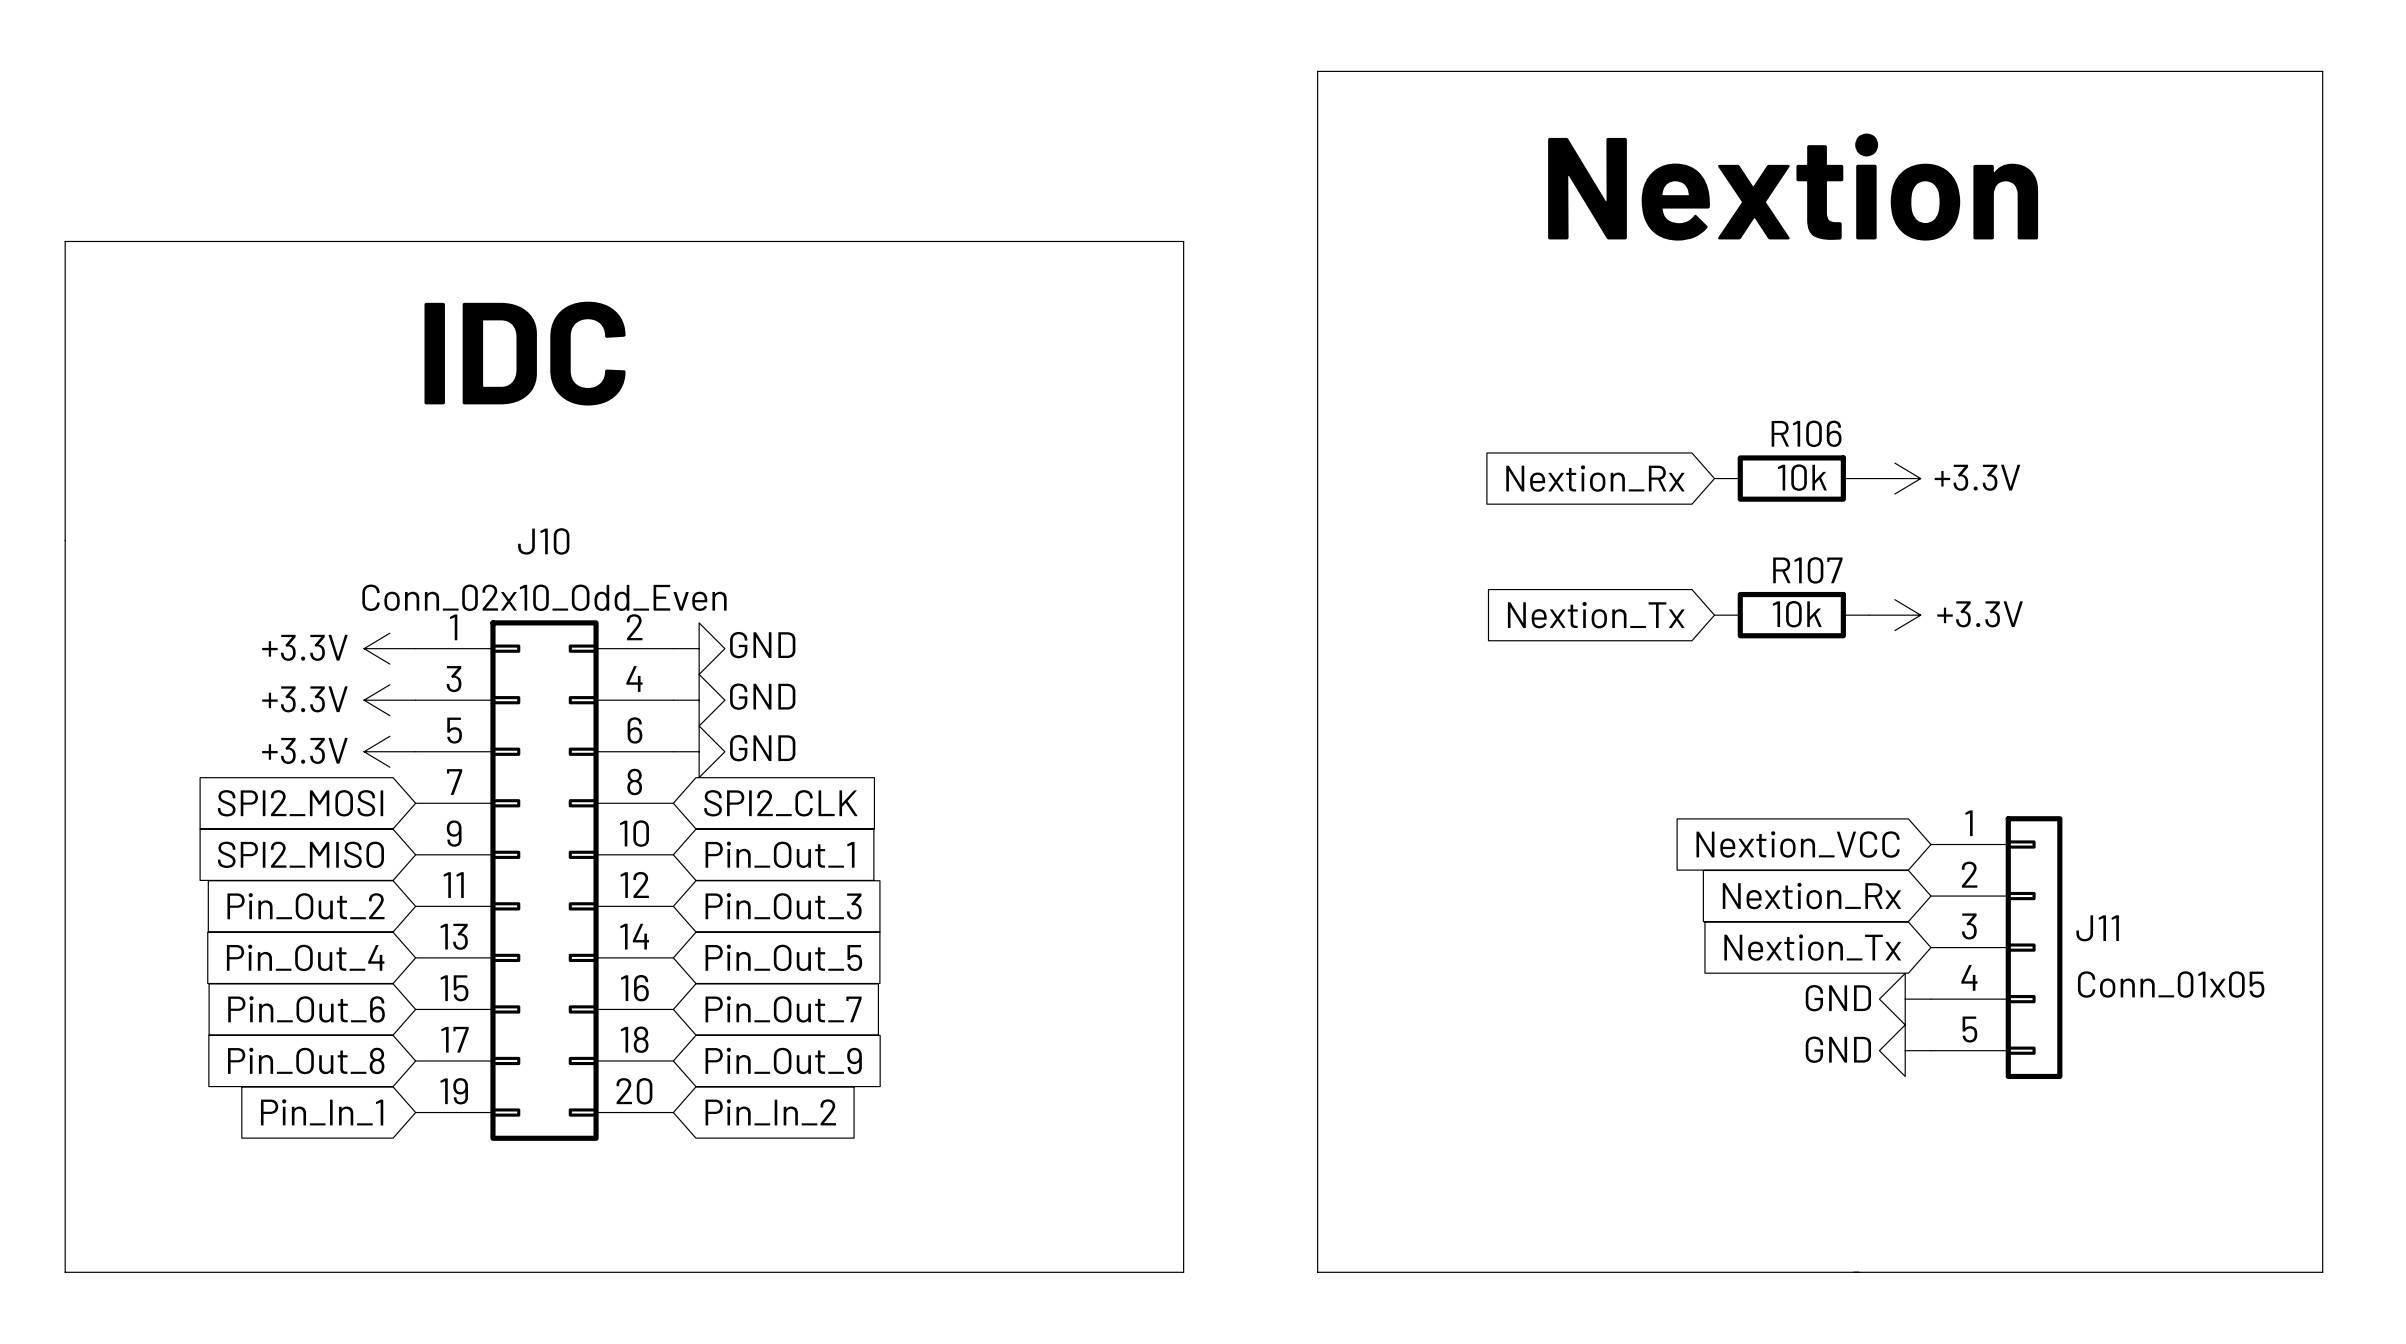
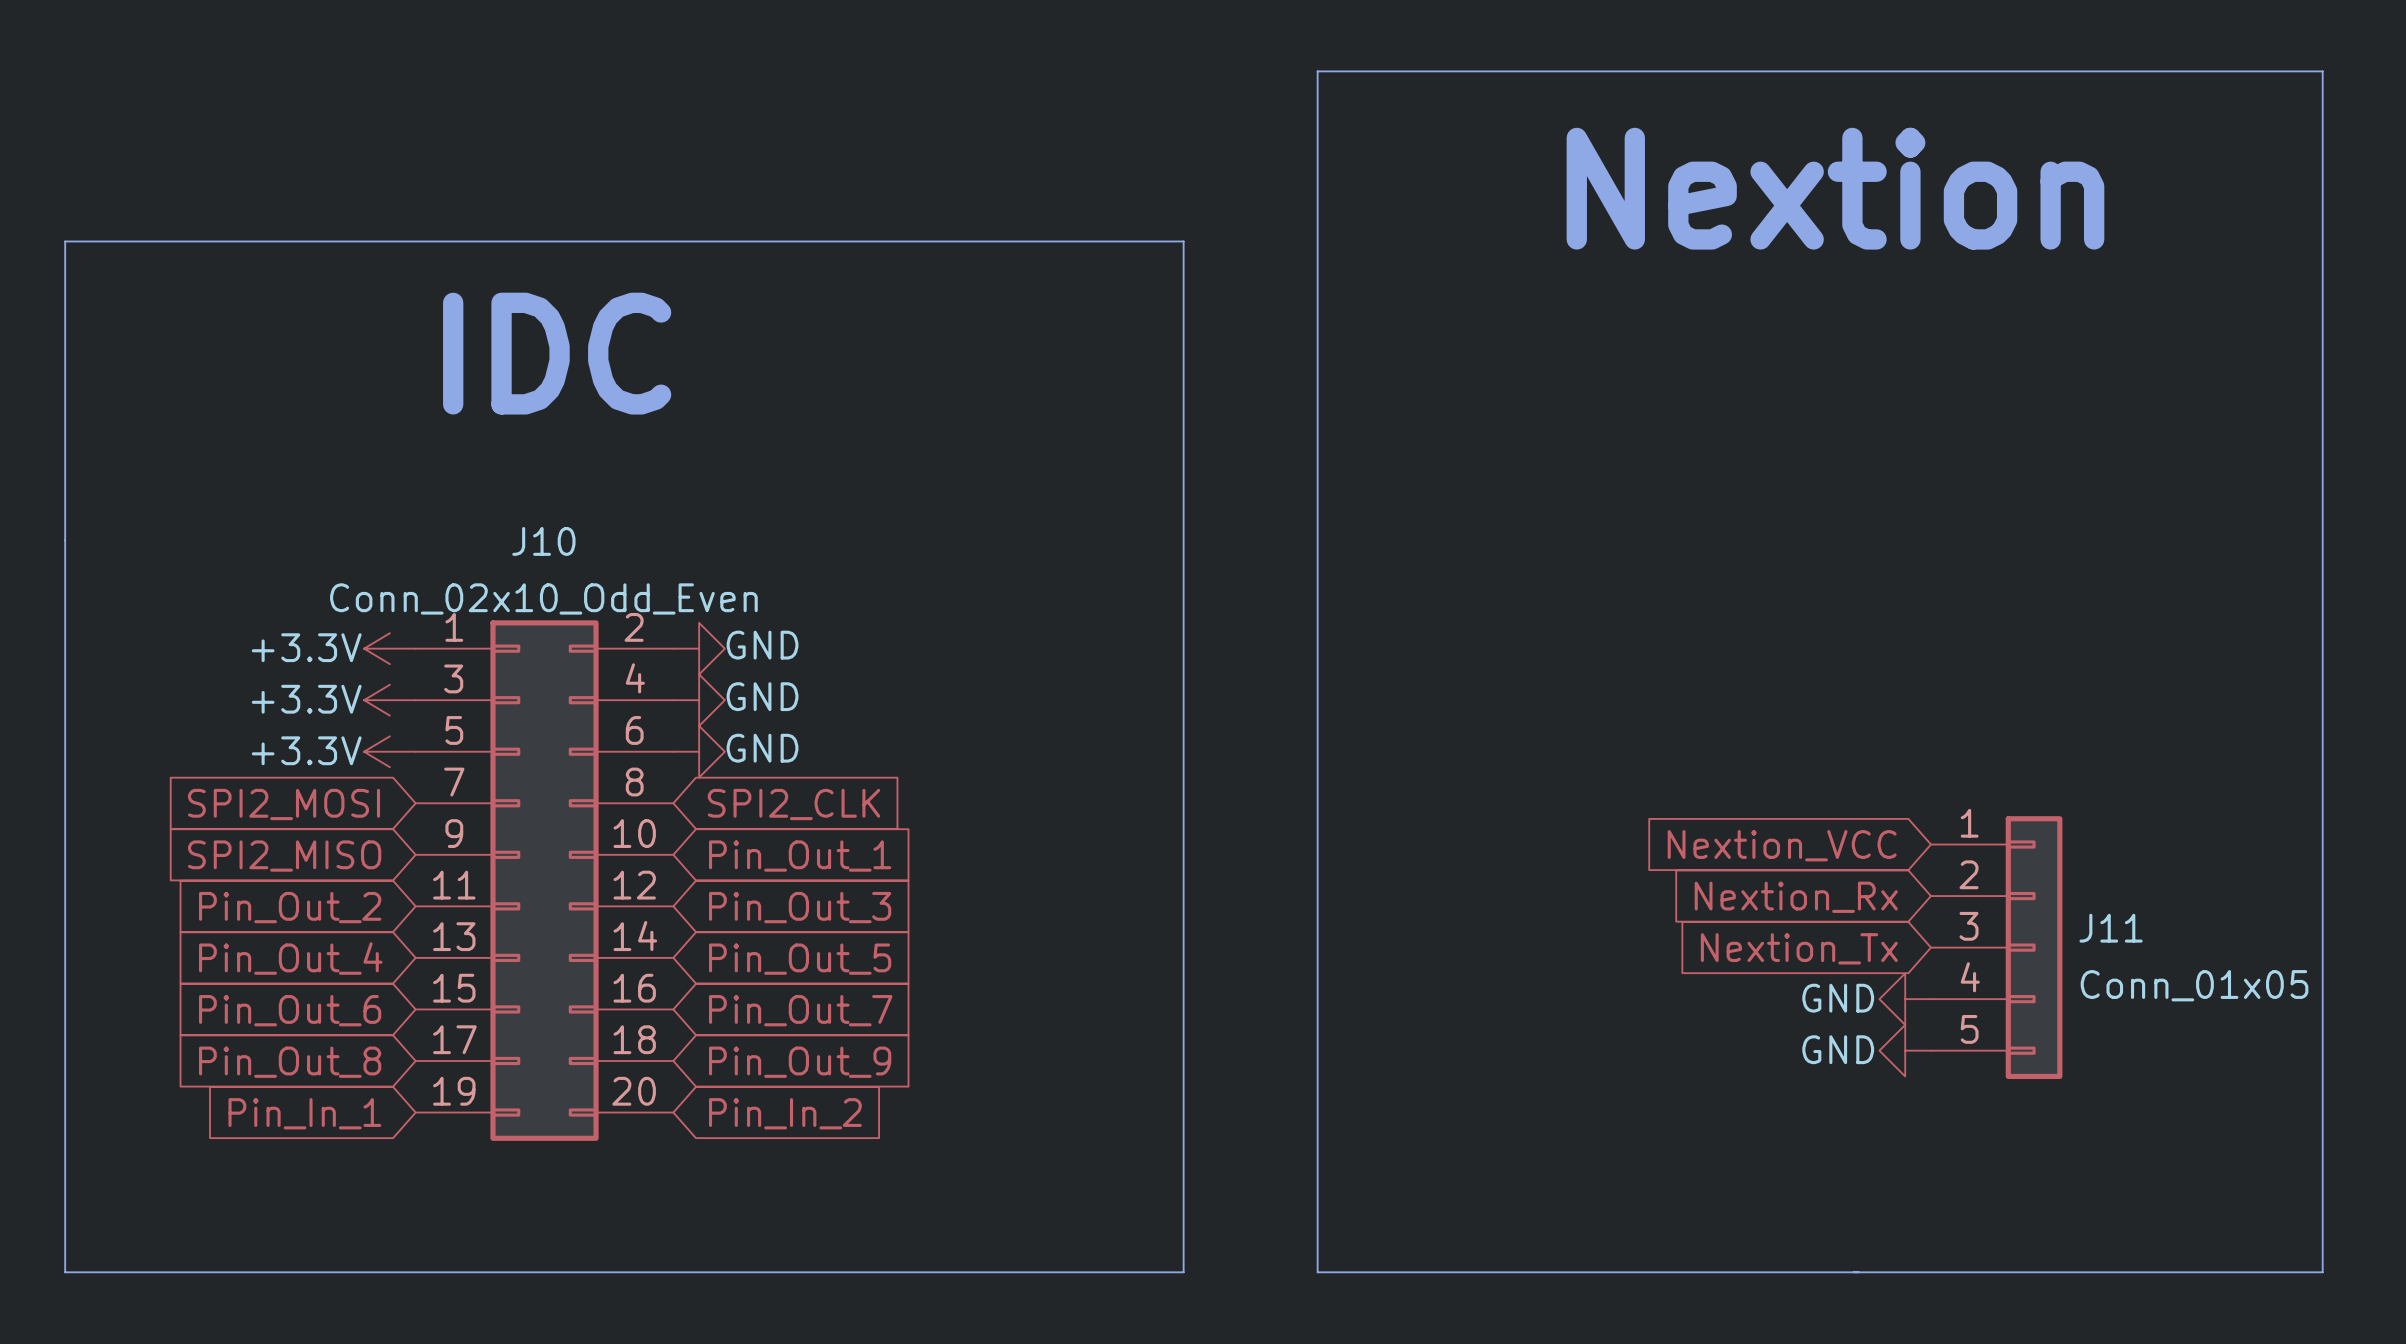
global label: Nextion_Rx (1595, 478) -> none
R106: 10k (1791, 478) -> none
power symbol: +3.3V (1894, 478) -> none
global label: Nextion_Tx (1596, 615) -> none
R107: 10k (1791, 615) -> none
power symbol: +3.3V (1894, 615) -> none

